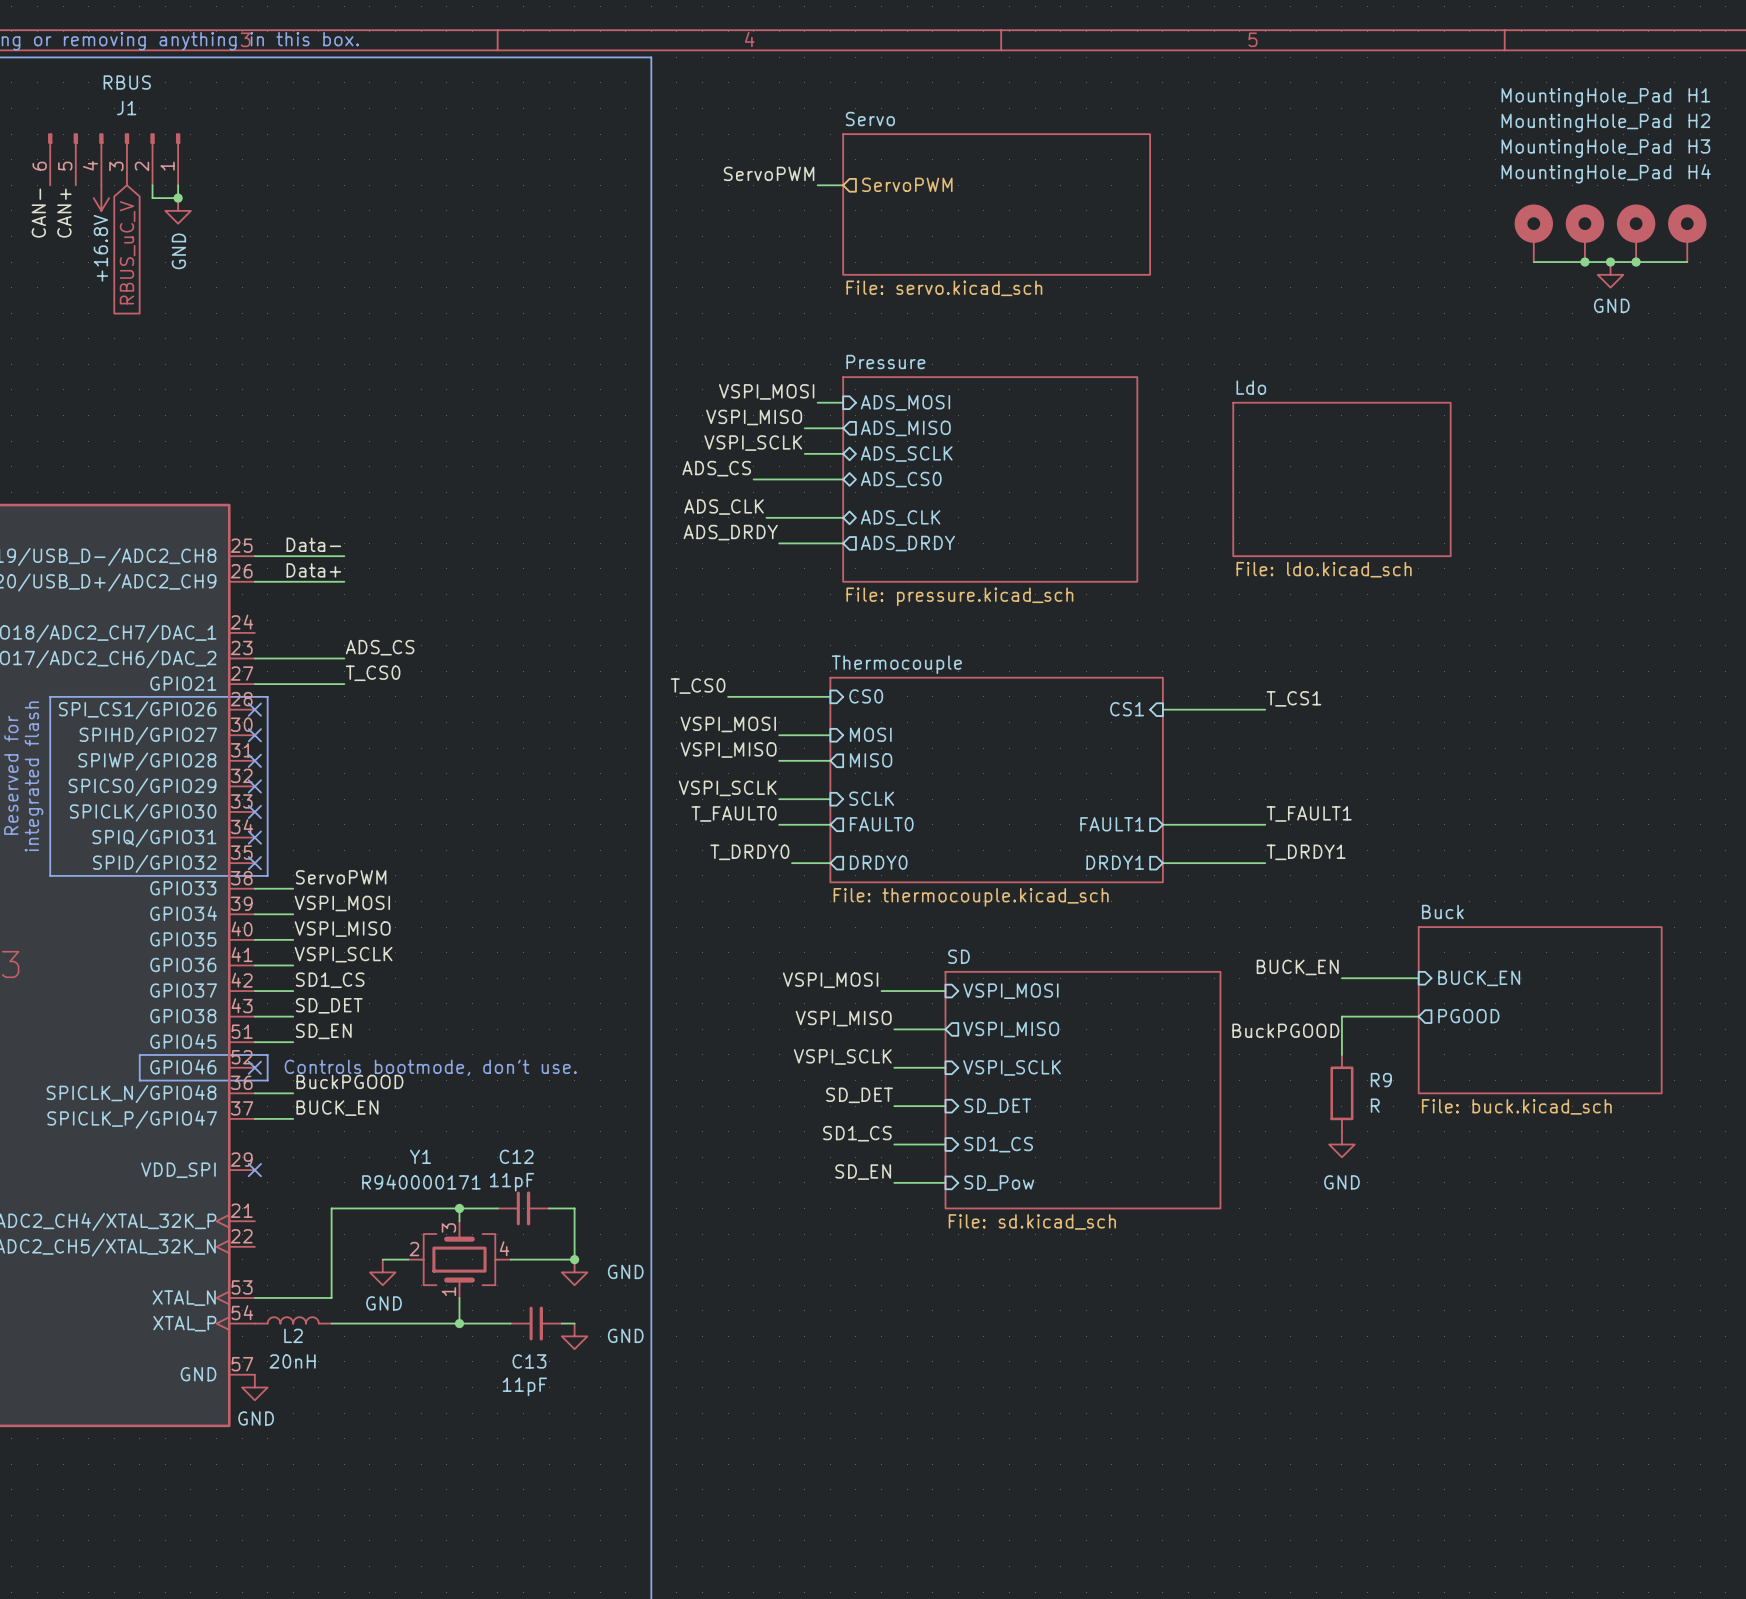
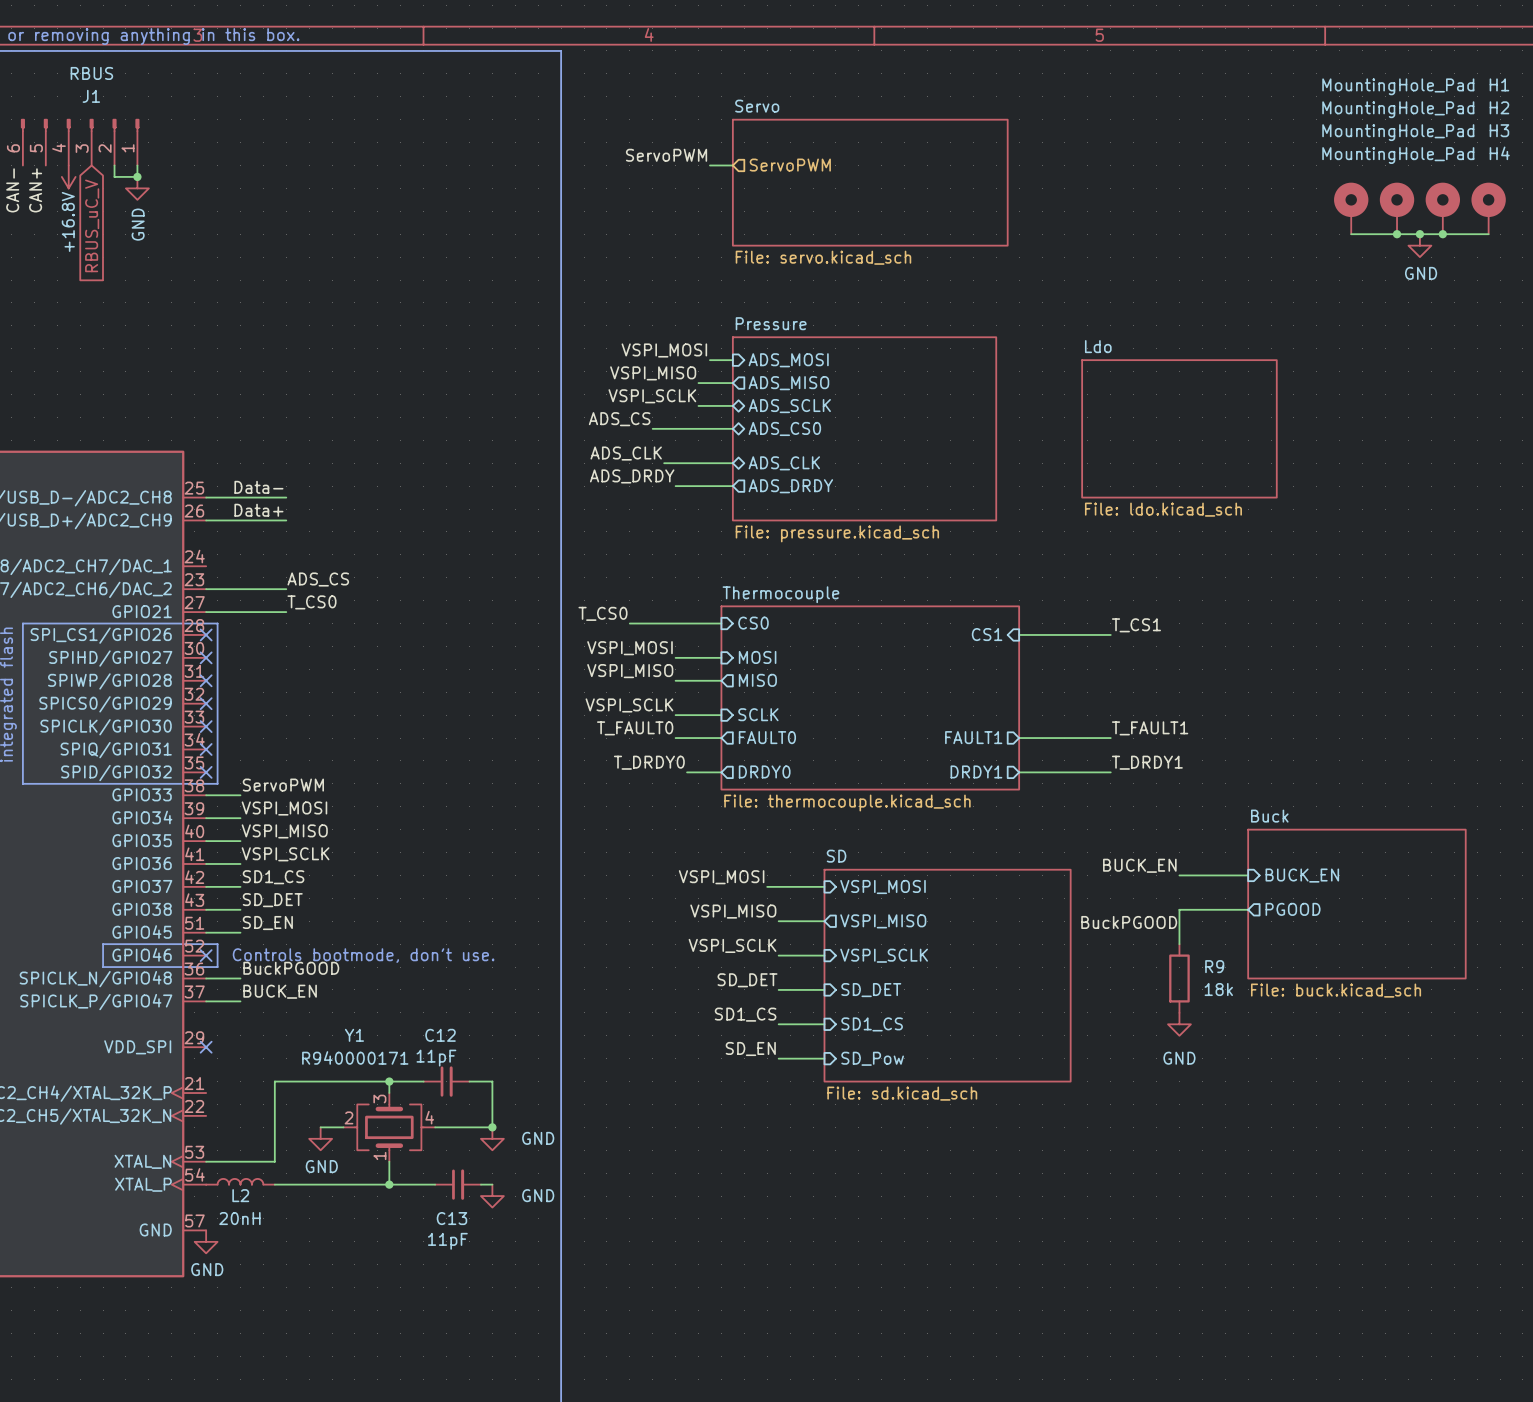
R9 value: R (1375, 1105) -> 18k (1218, 989)

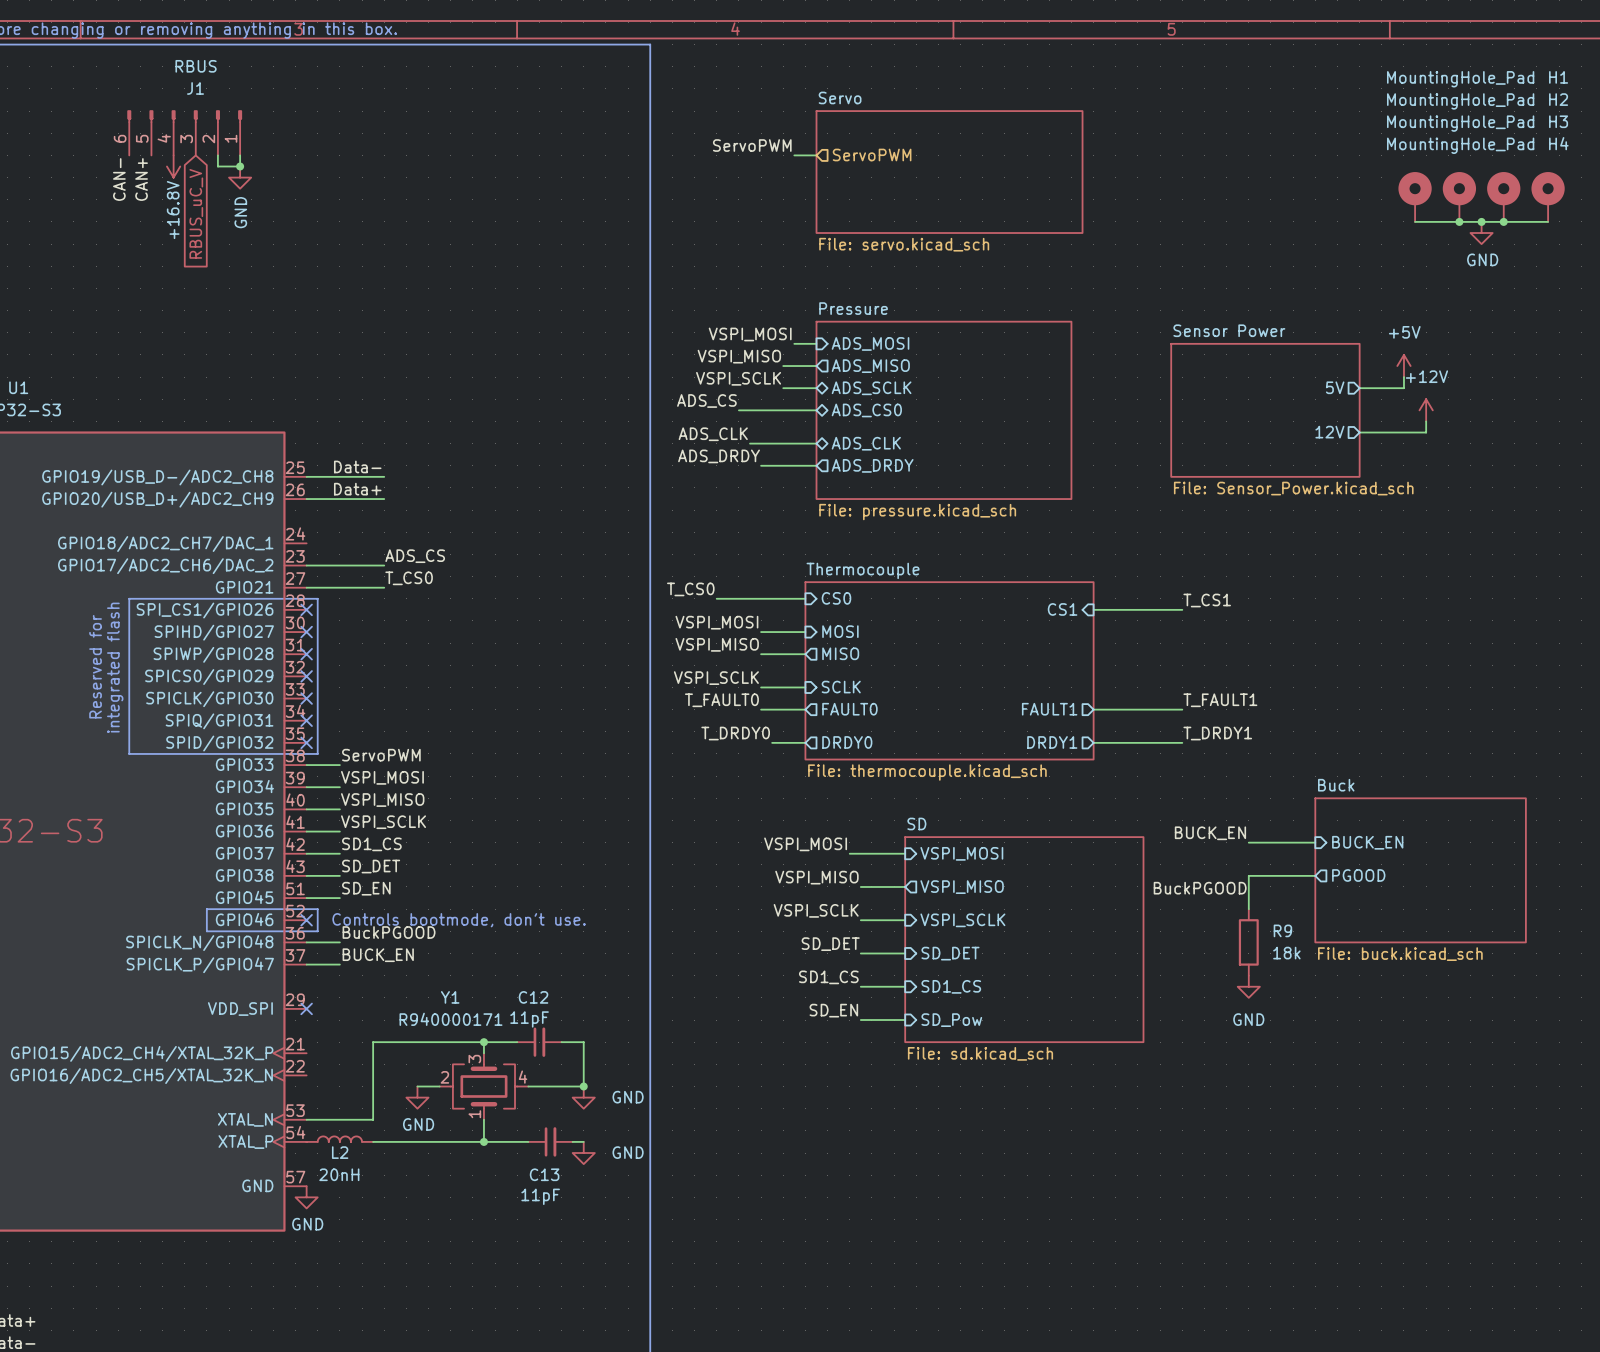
power symbol: none -> +5V (1403, 366)
wire: none -> (1403, 377) (1403, 388) (1359, 388)
sheet pin: none -> 5V (1335, 387)
sheet Ldo: File: ldo.kicad_sch (1179, 428) -> none
sheet Sensor Power: none -> File: Sensor_Power.kicad_sch (1265, 410)
power symbol: none -> +12V (1426, 410)
wire: none -> (1426, 421) (1426, 432) (1359, 432)
sheet pin: none -> 12V (1329, 432)

